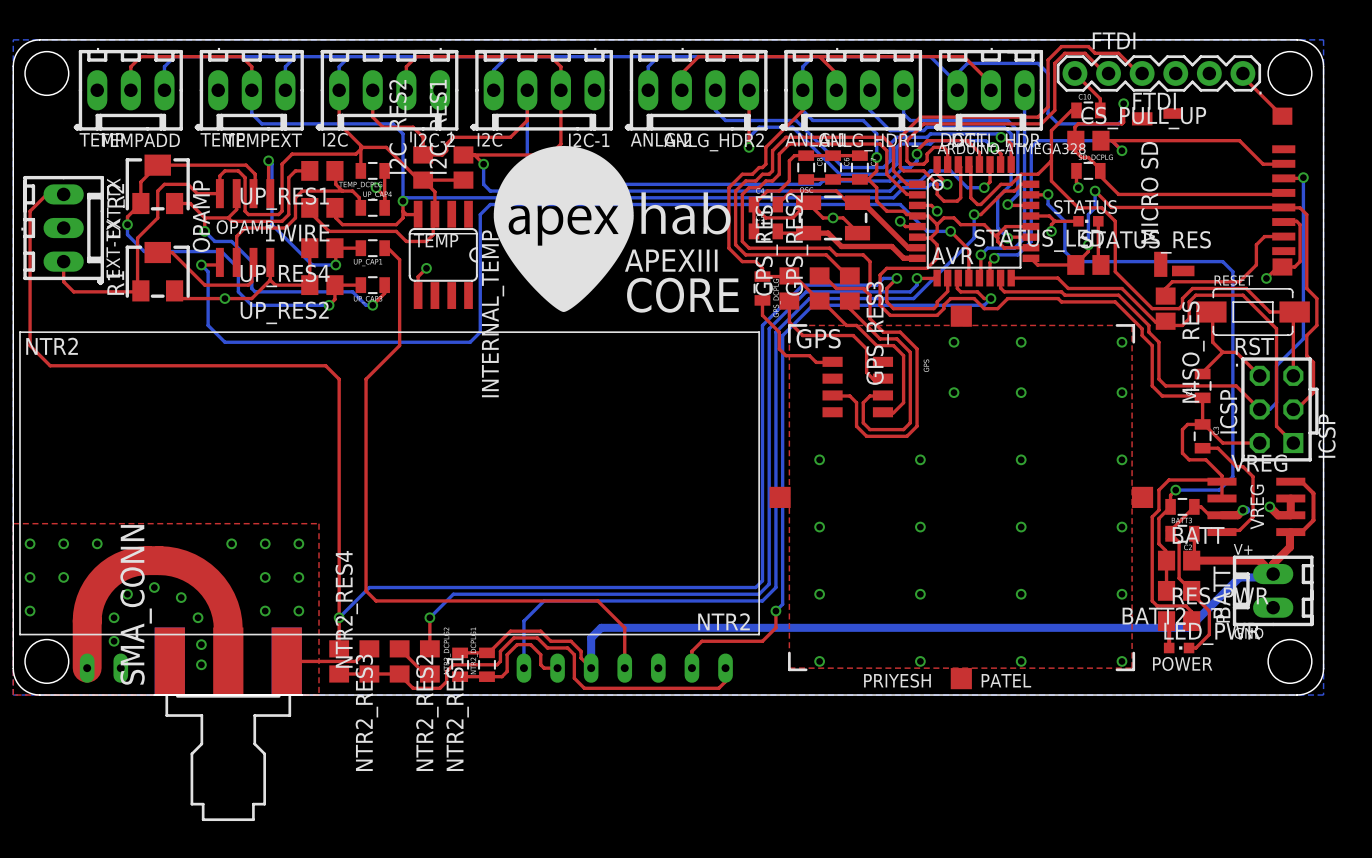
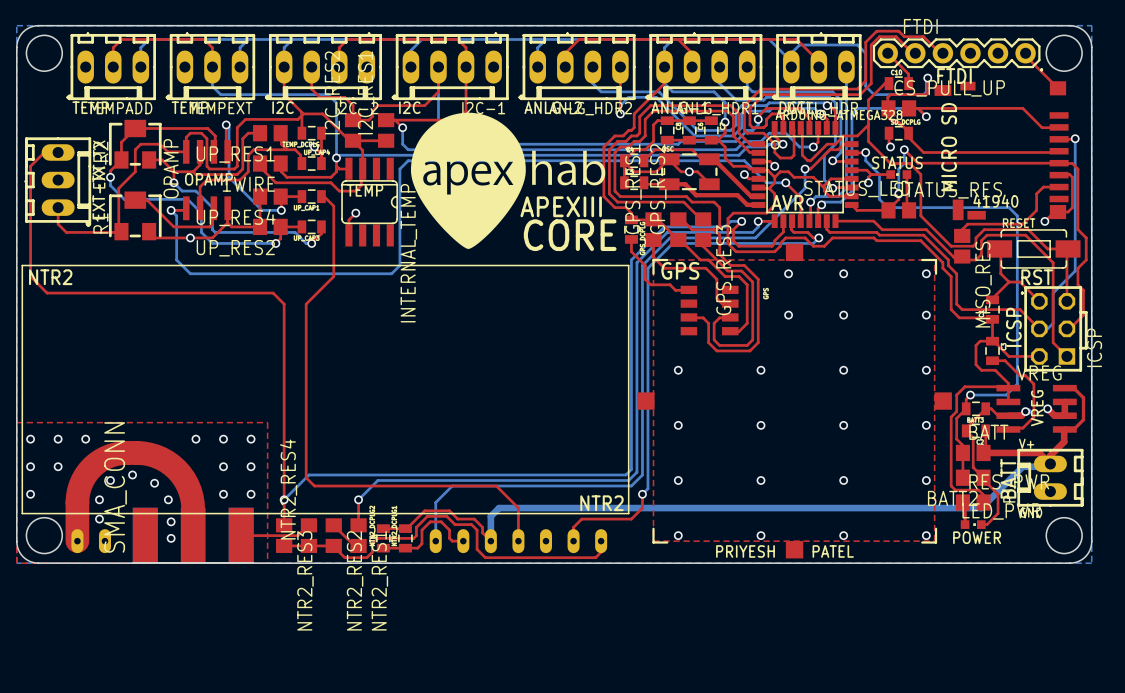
text: none -> 41940 (995, 201)
SMA_CONN: none -> (193, 535)
SMA_CONN: (228, 724) -> none

